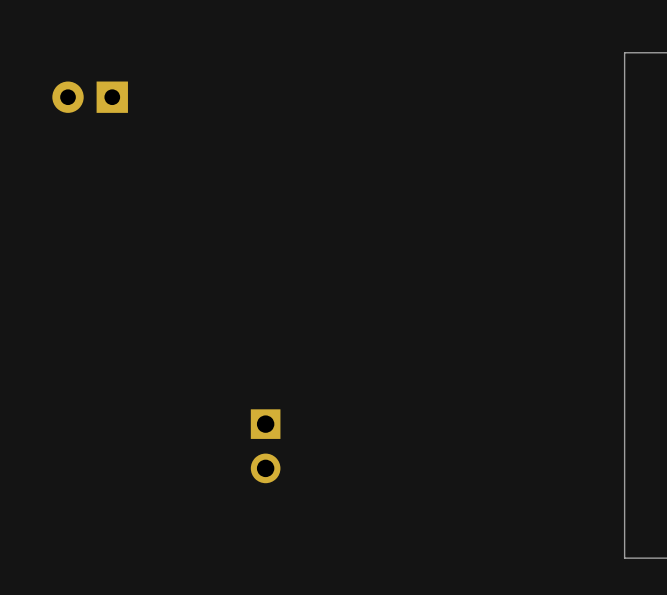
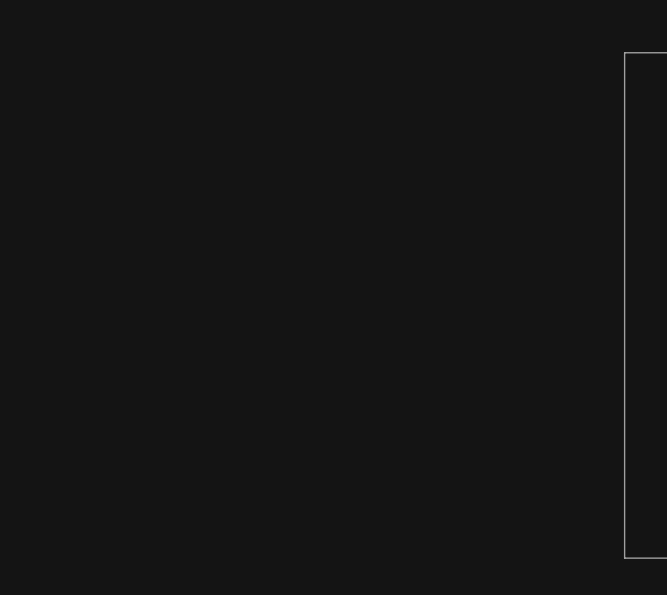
part: (90, 97) -> none
part: (265, 446) -> none

